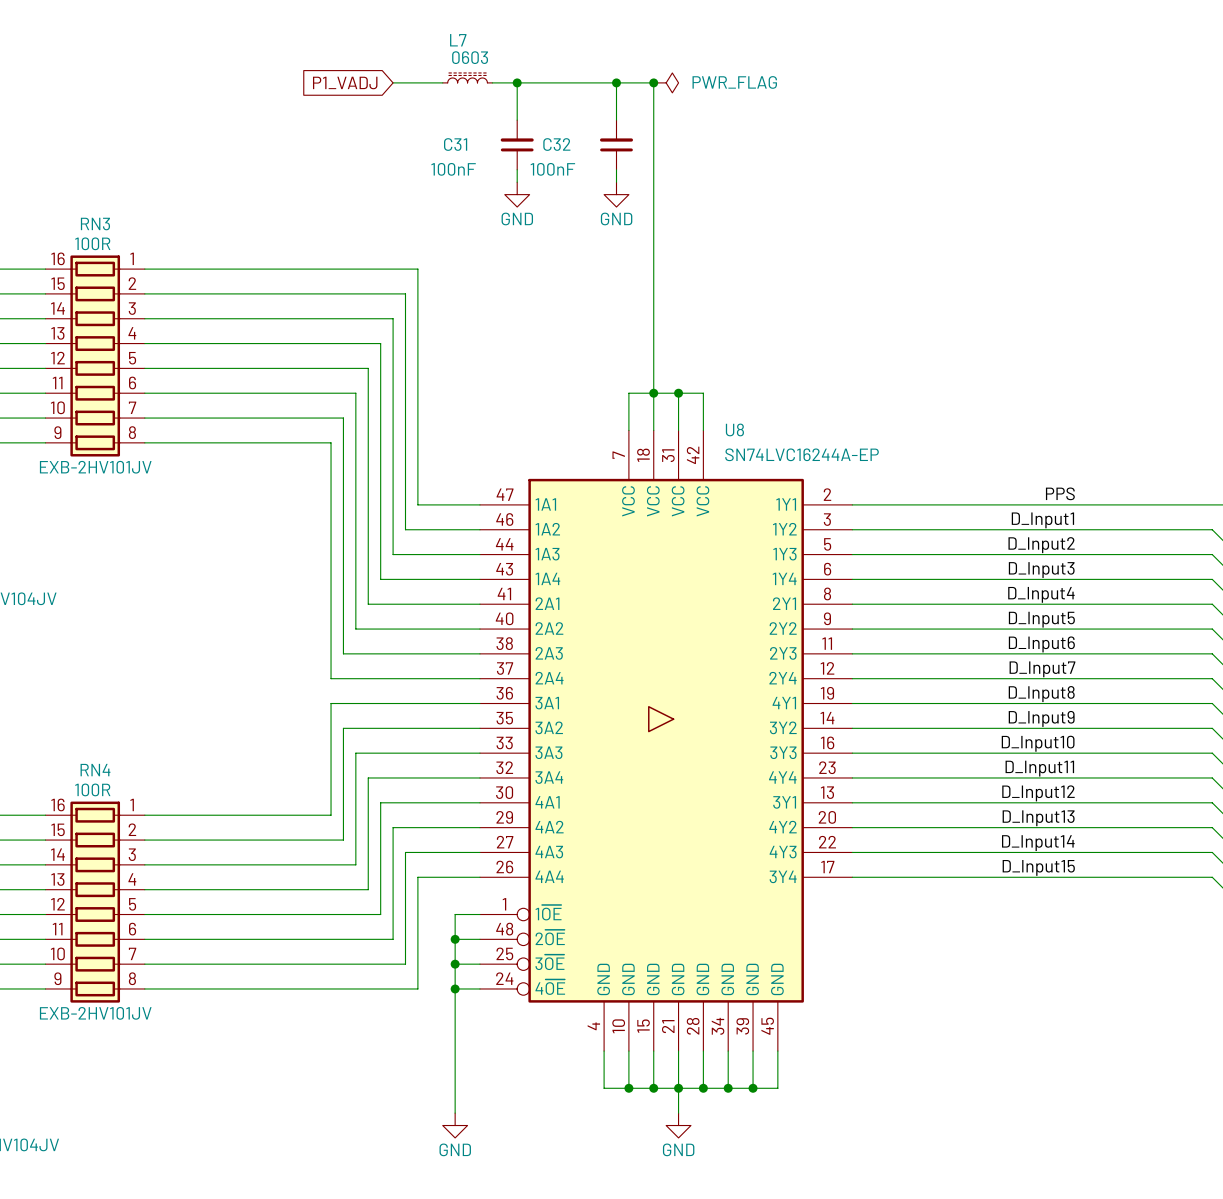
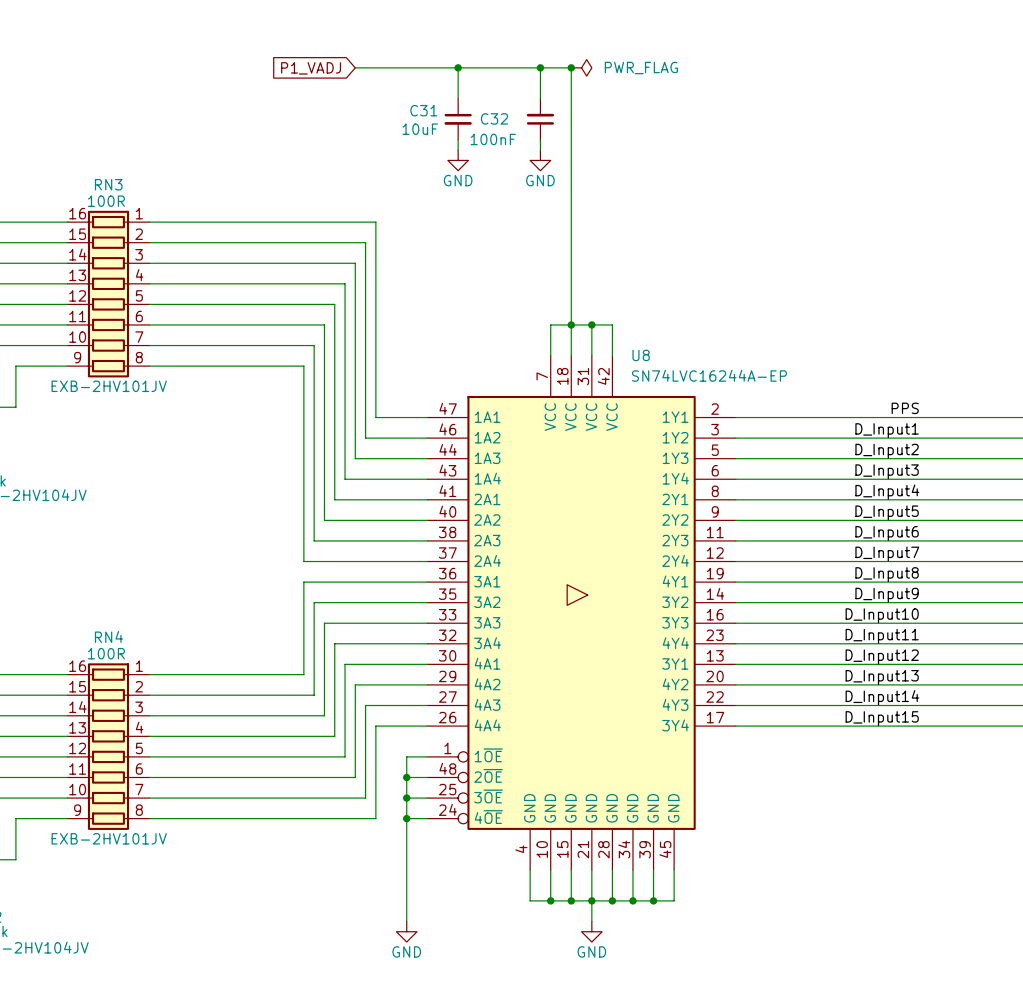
L7: 0603 (467, 77) -> none
wire: none -> (396, 67) (437, 67)
C31 rotation: 0° (517, 144) -> 180° (458, 119)
C31 value: 100nF (453, 169) -> 10uF (420, 129)

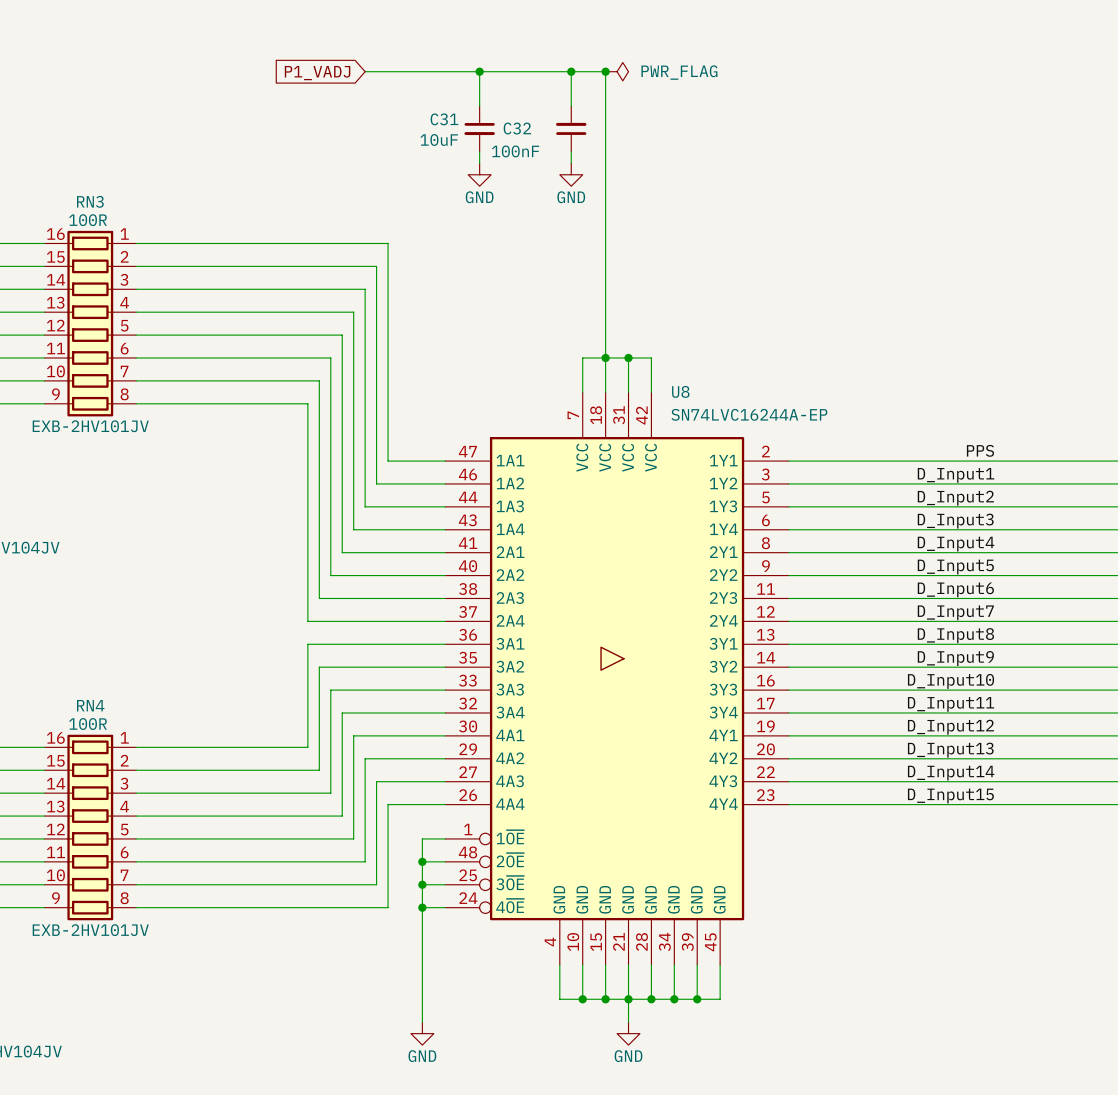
U8 pin number: 19 (715, 573) -> 13 (765, 634)
U8 pin name: 4Y1 (675, 581) -> 3Y1 (723, 643)
U8 pin number: 23 (715, 635) -> 17 (765, 703)
U8 pin name: 4Y4 (675, 643) -> 3Y4 (723, 712)
U8 pin number: 13 (715, 655) -> 19 (765, 726)
U8 pin name: 3Y1 (675, 663) -> 4Y1 (723, 735)
U8 pin number: 17 (715, 717) -> 23 (765, 795)
U8 pin name: 3Y4 (675, 725) -> 4Y4 (723, 804)

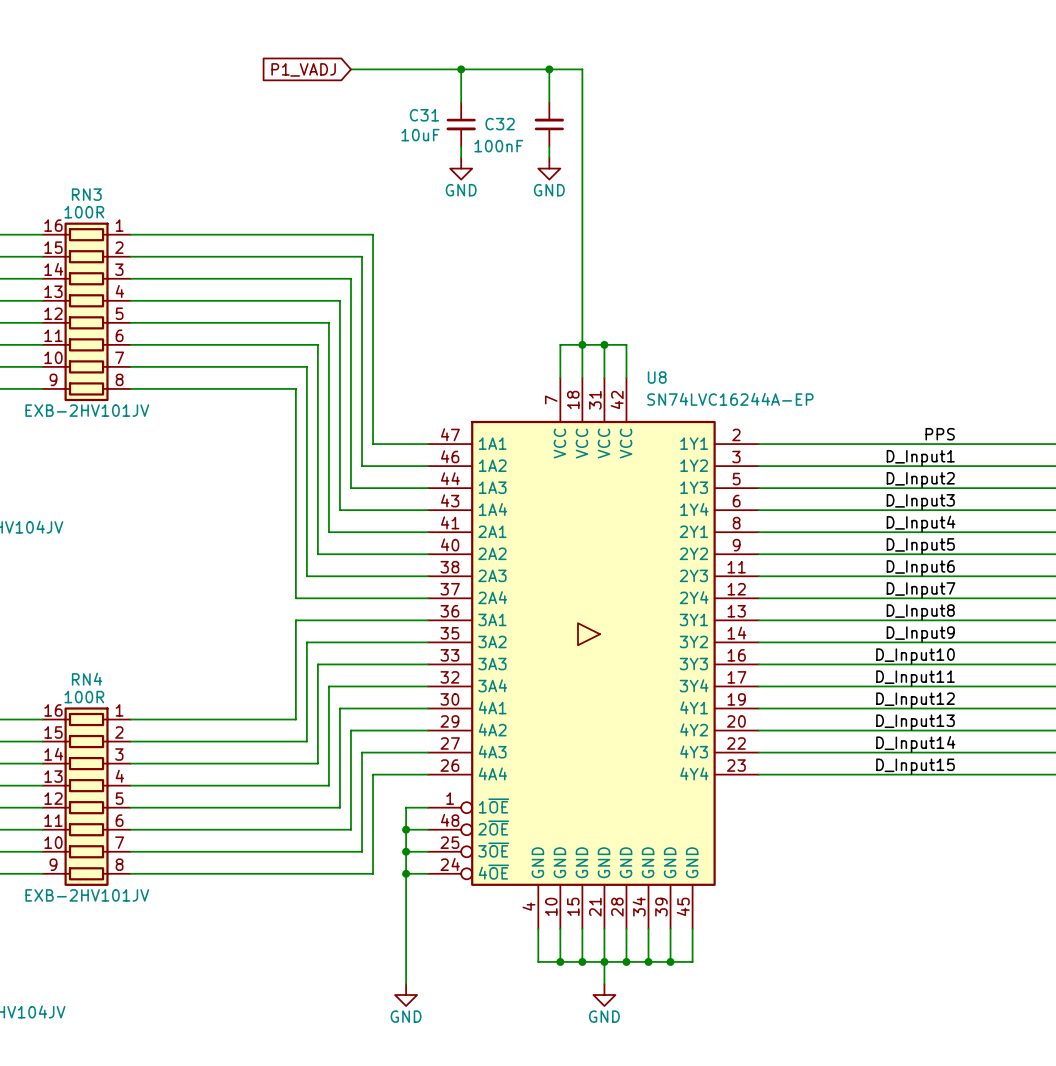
junction: (605, 71) -> none
power symbol: PWR_FLAG (617, 71) -> none

